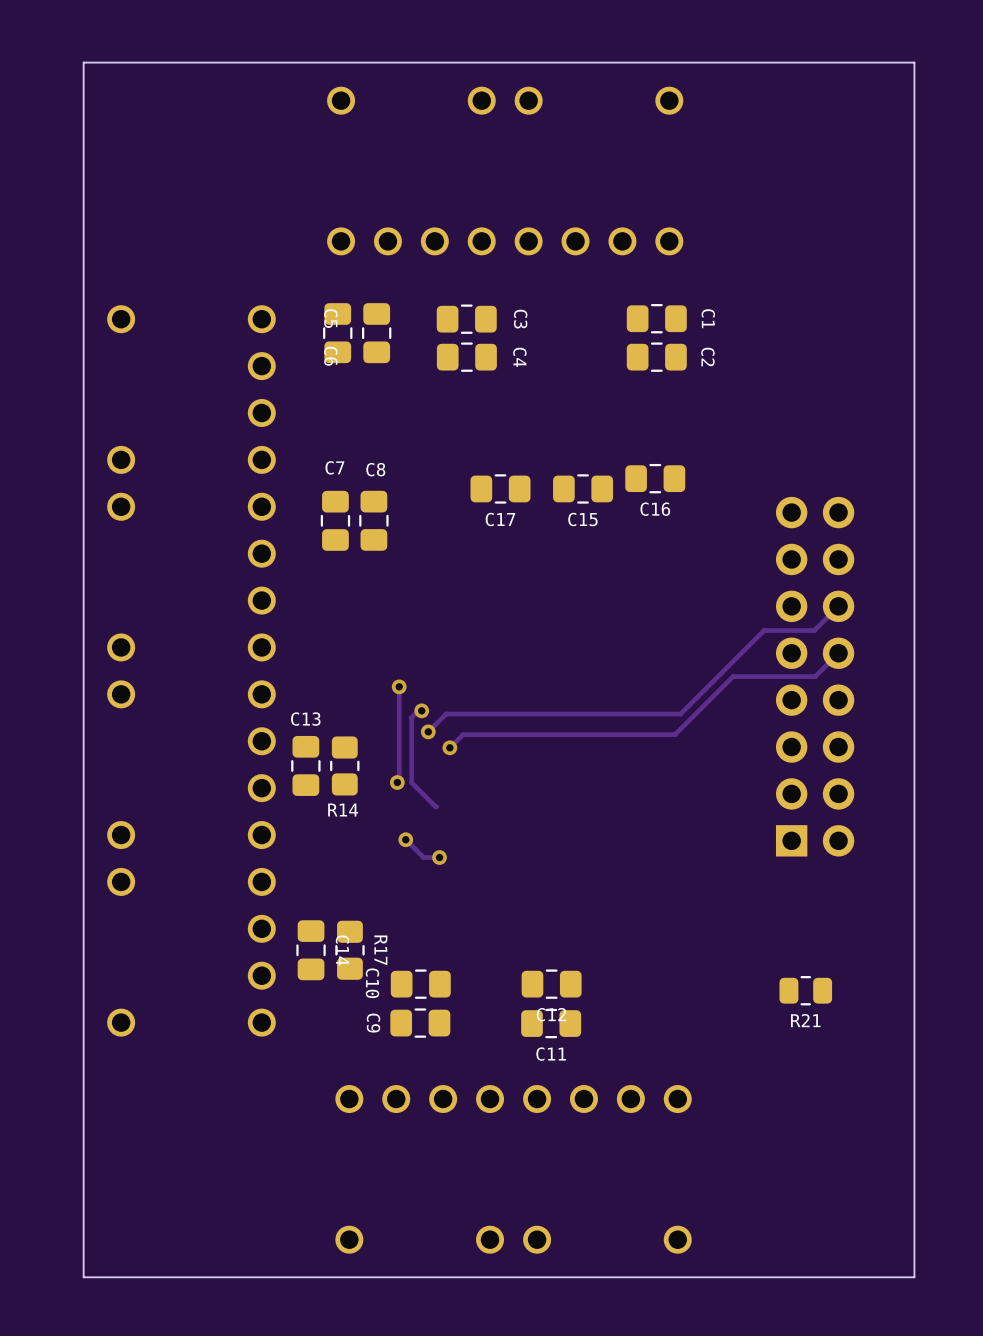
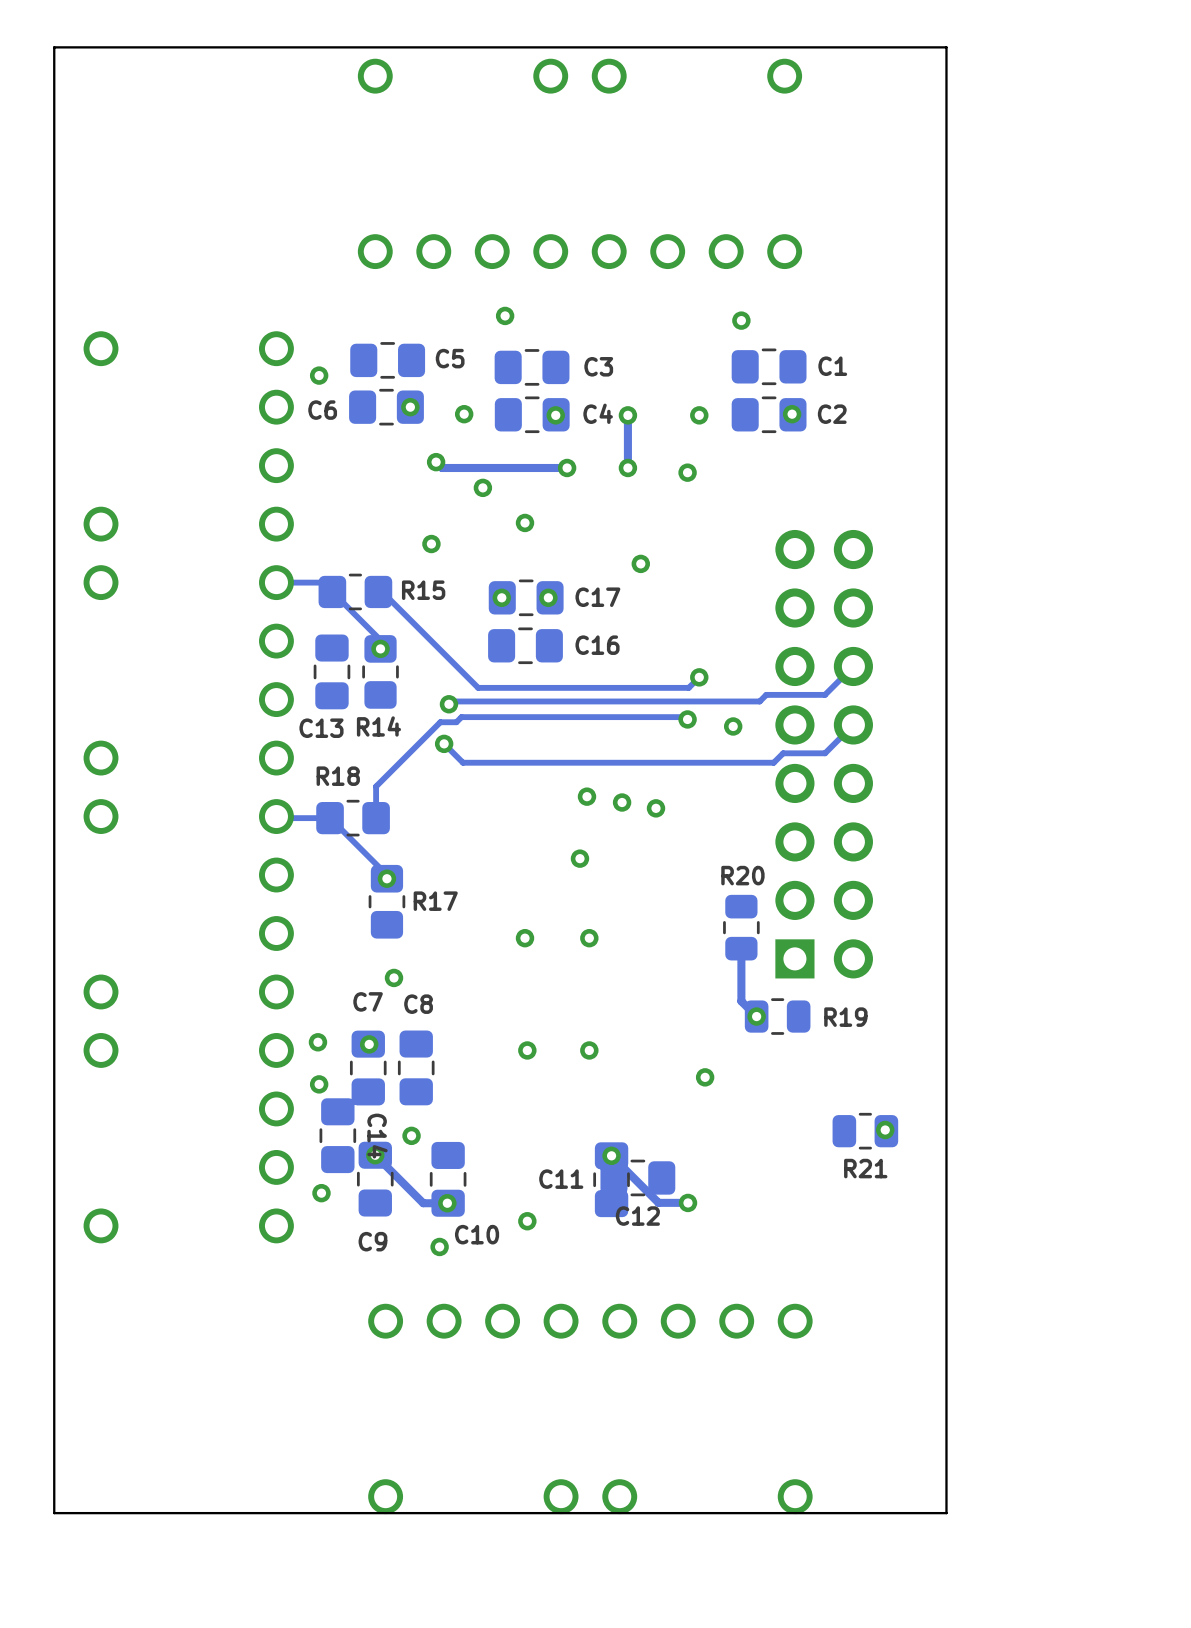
board edge: (83, 77) (83, 62) (914, 62) (914, 1277) (83, 1277) (83, 1252) -> (54, 47) (946, 47) (946, 1513) (54, 1513)
via: none -> (505, 315)
via: none -> (741, 320)
C1 position: (656, 318) -> (769, 366)
C1 name rotation: 0° (708, 318) -> 90° counterclockwise (832, 366)
C3 position: (466, 319) -> (532, 367)
C3 name rotation: 0° (520, 319) -> 90° counterclockwise (598, 366)
C5 rotation: 0° (337, 333) -> 90° clockwise (387, 360)
C6 rotation: 0° (376, 333) -> 90° clockwise (386, 407)
C6 position: (376, 333) -> (386, 407)
via: none -> (319, 375)
C4 position: (466, 357) -> (532, 414)
C4 name rotation: 0° (519, 357) -> 90° counterclockwise (598, 413)
C2 position: (656, 357) -> (769, 414)
C2 name rotation: 0° (707, 357) -> 90° counterclockwise (832, 414)
via: none -> (410, 407)
via: none -> (464, 414)
via: none -> (792, 414)
via: none -> (555, 415)
track: none -> (627, 415) (627, 467)
via: none -> (627, 415)
via: none -> (699, 415)
track: none -> (436, 462) (441, 467) (567, 467)
via: none -> (436, 462)
via: none -> (567, 467)
via: none -> (627, 467)
via: none -> (687, 472)
via: none -> (482, 487)
via: none -> (525, 522)
via: none -> (431, 544)
C16 position: (655, 478) -> (525, 645)
C17 position: (500, 488) -> (526, 597)
C15: (583, 488) -> none
via: none -> (640, 563)
track: none -> (276, 582) (323, 582) (380, 640) (380, 648)
C16 name position: C16 (655, 509) -> C16 (597, 645)
R15: none -> (355, 591)
track: none -> (378, 591) (382, 591) (478, 687) (688, 687) (699, 677)
via: none -> (501, 597)
via: none -> (548, 597)
C17 name position: C17 (500, 519) -> C17 (597, 597)
C7 position: (335, 520) -> (368, 1068)
C8 position: (373, 520) -> (416, 1067)
via: none -> (380, 648)
track: none -> (853, 666) (824, 694) (766, 694) (759, 701) (451, 701) (448, 704)
via: none -> (699, 677)
via: none -> (448, 704)
track: (838, 606) (814, 630) (764, 630) (680, 714) (446, 714) (428, 731) -> none
track: none -> (687, 719) (685, 717) (461, 717) (456, 722) (440, 722) (376, 786) (376, 818)
via: none -> (687, 719)
track: none -> (853, 724) (825, 753) (783, 753) (773, 762) (463, 762) (444, 743)
via: none -> (733, 726)
via: none -> (444, 743)
track: (838, 653) (815, 676) (733, 676) (674, 734) (462, 734) (449, 747) -> none
part position: (815, 676) -> (824, 754)
via: none -> (586, 796)
via: none -> (622, 802)
track: (399, 686) (399, 780) (397, 782) -> none
via: (399, 686) -> none
via: none -> (656, 808)
track: none -> (276, 816) (278, 818) (330, 818) (386, 875) (386, 878)
R18: none -> (353, 818)
track: (421, 710) (418, 710) (411, 717) (411, 782) (436, 806) -> none
via: (421, 710) -> none
C13 name position: C13 (305, 719) -> C13 (321, 728)
via: none -> (579, 858)
via: (428, 731) -> none
via: none -> (386, 878)
via: (449, 747) -> none
C13 position: (305, 765) -> (331, 671)
R14 position: (344, 765) -> (380, 671)
via: (397, 782) -> none
R20: none -> (741, 927)
via: none -> (525, 938)
via: none -> (589, 938)
track: none -> (741, 948) (741, 1001) (756, 1016)
via: none -> (394, 977)
track: (405, 839) (423, 857) (439, 857) -> none
via: (405, 839) -> none
via: none -> (756, 1016)
R19: none -> (777, 1016)
via position: (439, 857) -> (527, 1050)
via: none -> (317, 1042)
via: none -> (369, 1044)
via: none -> (589, 1050)
via: none -> (705, 1077)
via: none -> (319, 1084)
via: none -> (885, 1130)
R17 position: (349, 950) -> (386, 901)
via: none -> (411, 1135)
R17 name rotation: 0° (380, 950) -> 90° counterclockwise (435, 901)
track: none -> (375, 1155) (423, 1203) (448, 1203)
via: none -> (375, 1155)
track: none -> (611, 1155) (658, 1202) (687, 1202)
via: none -> (611, 1155)
C10 name position: C10 (372, 983) -> C10 (477, 1234)
C10 rotation: 0° (420, 984) -> 90° clockwise (448, 1179)
R21 position: (805, 990) -> (865, 1131)
via: none -> (321, 1193)
via: none -> (447, 1203)
via: none -> (688, 1202)
via: none -> (527, 1221)
C9 name position: C9 (373, 1023) -> C9 (372, 1241)
C9 rotation: 0° (420, 1023) -> 90° clockwise (375, 1179)
C9 position: (420, 1023) -> (375, 1179)
C11 rotation: 0° (551, 1023) -> 90° clockwise (611, 1179)
C11 position: (551, 1023) -> (611, 1179)
via: none -> (439, 1246)

